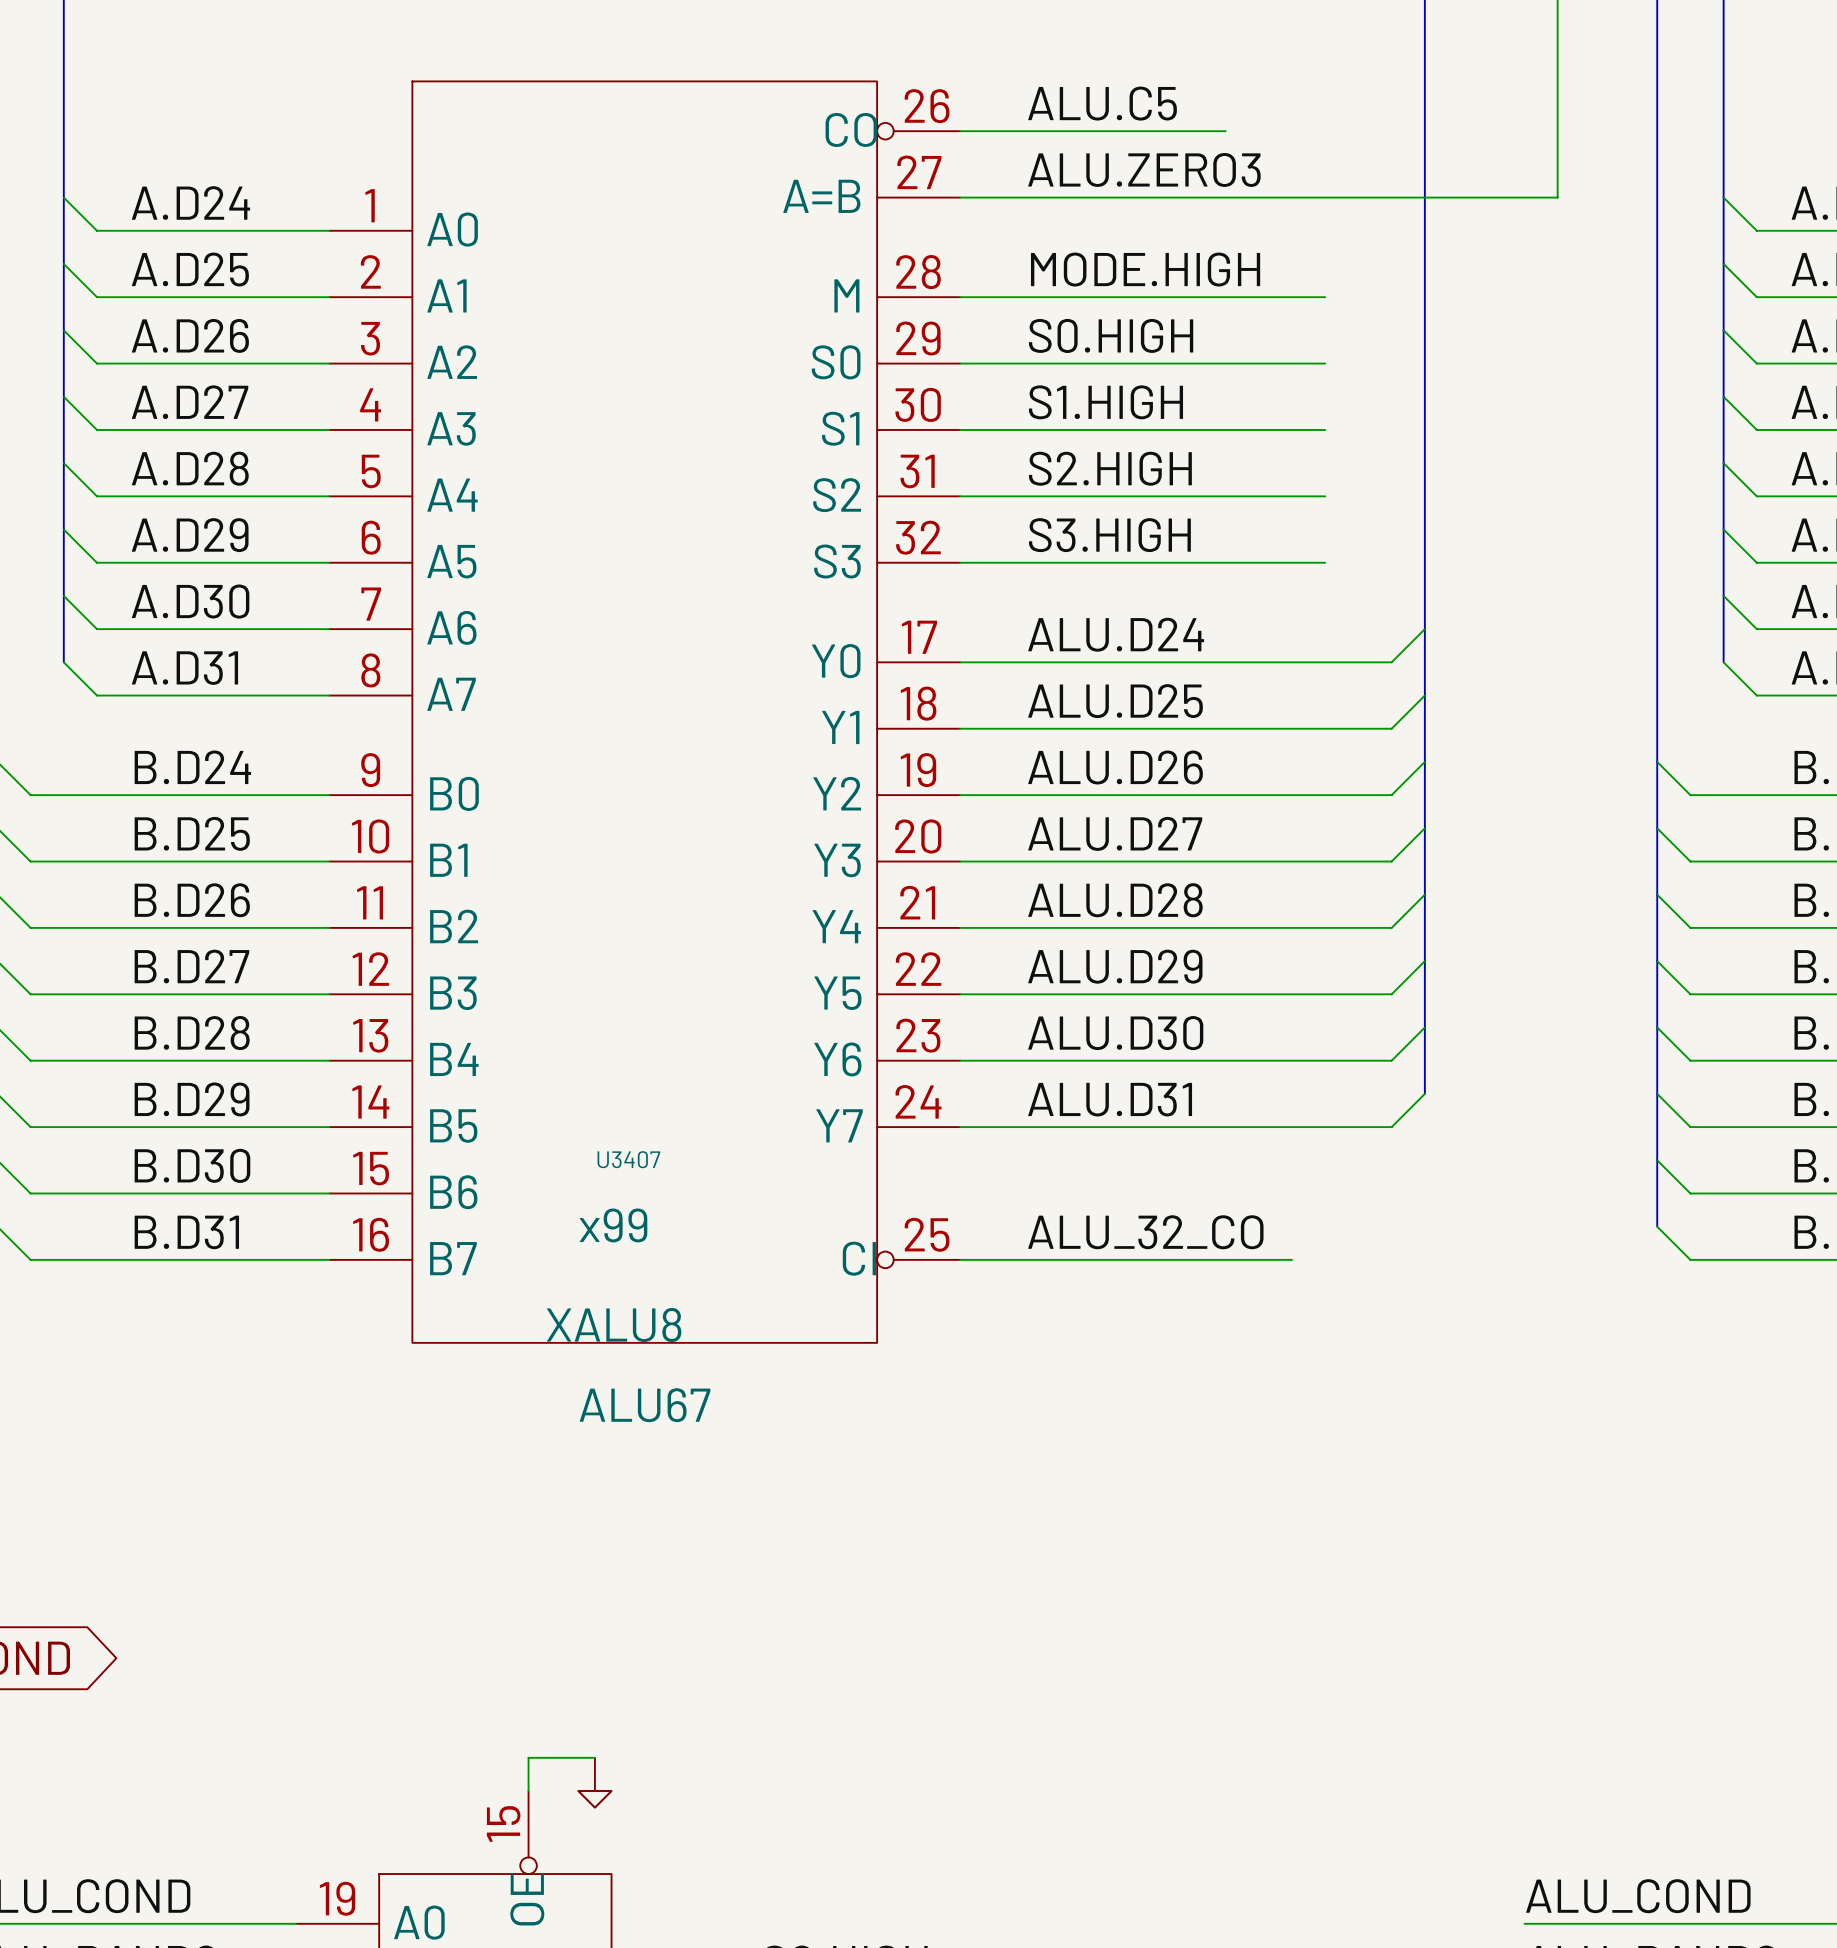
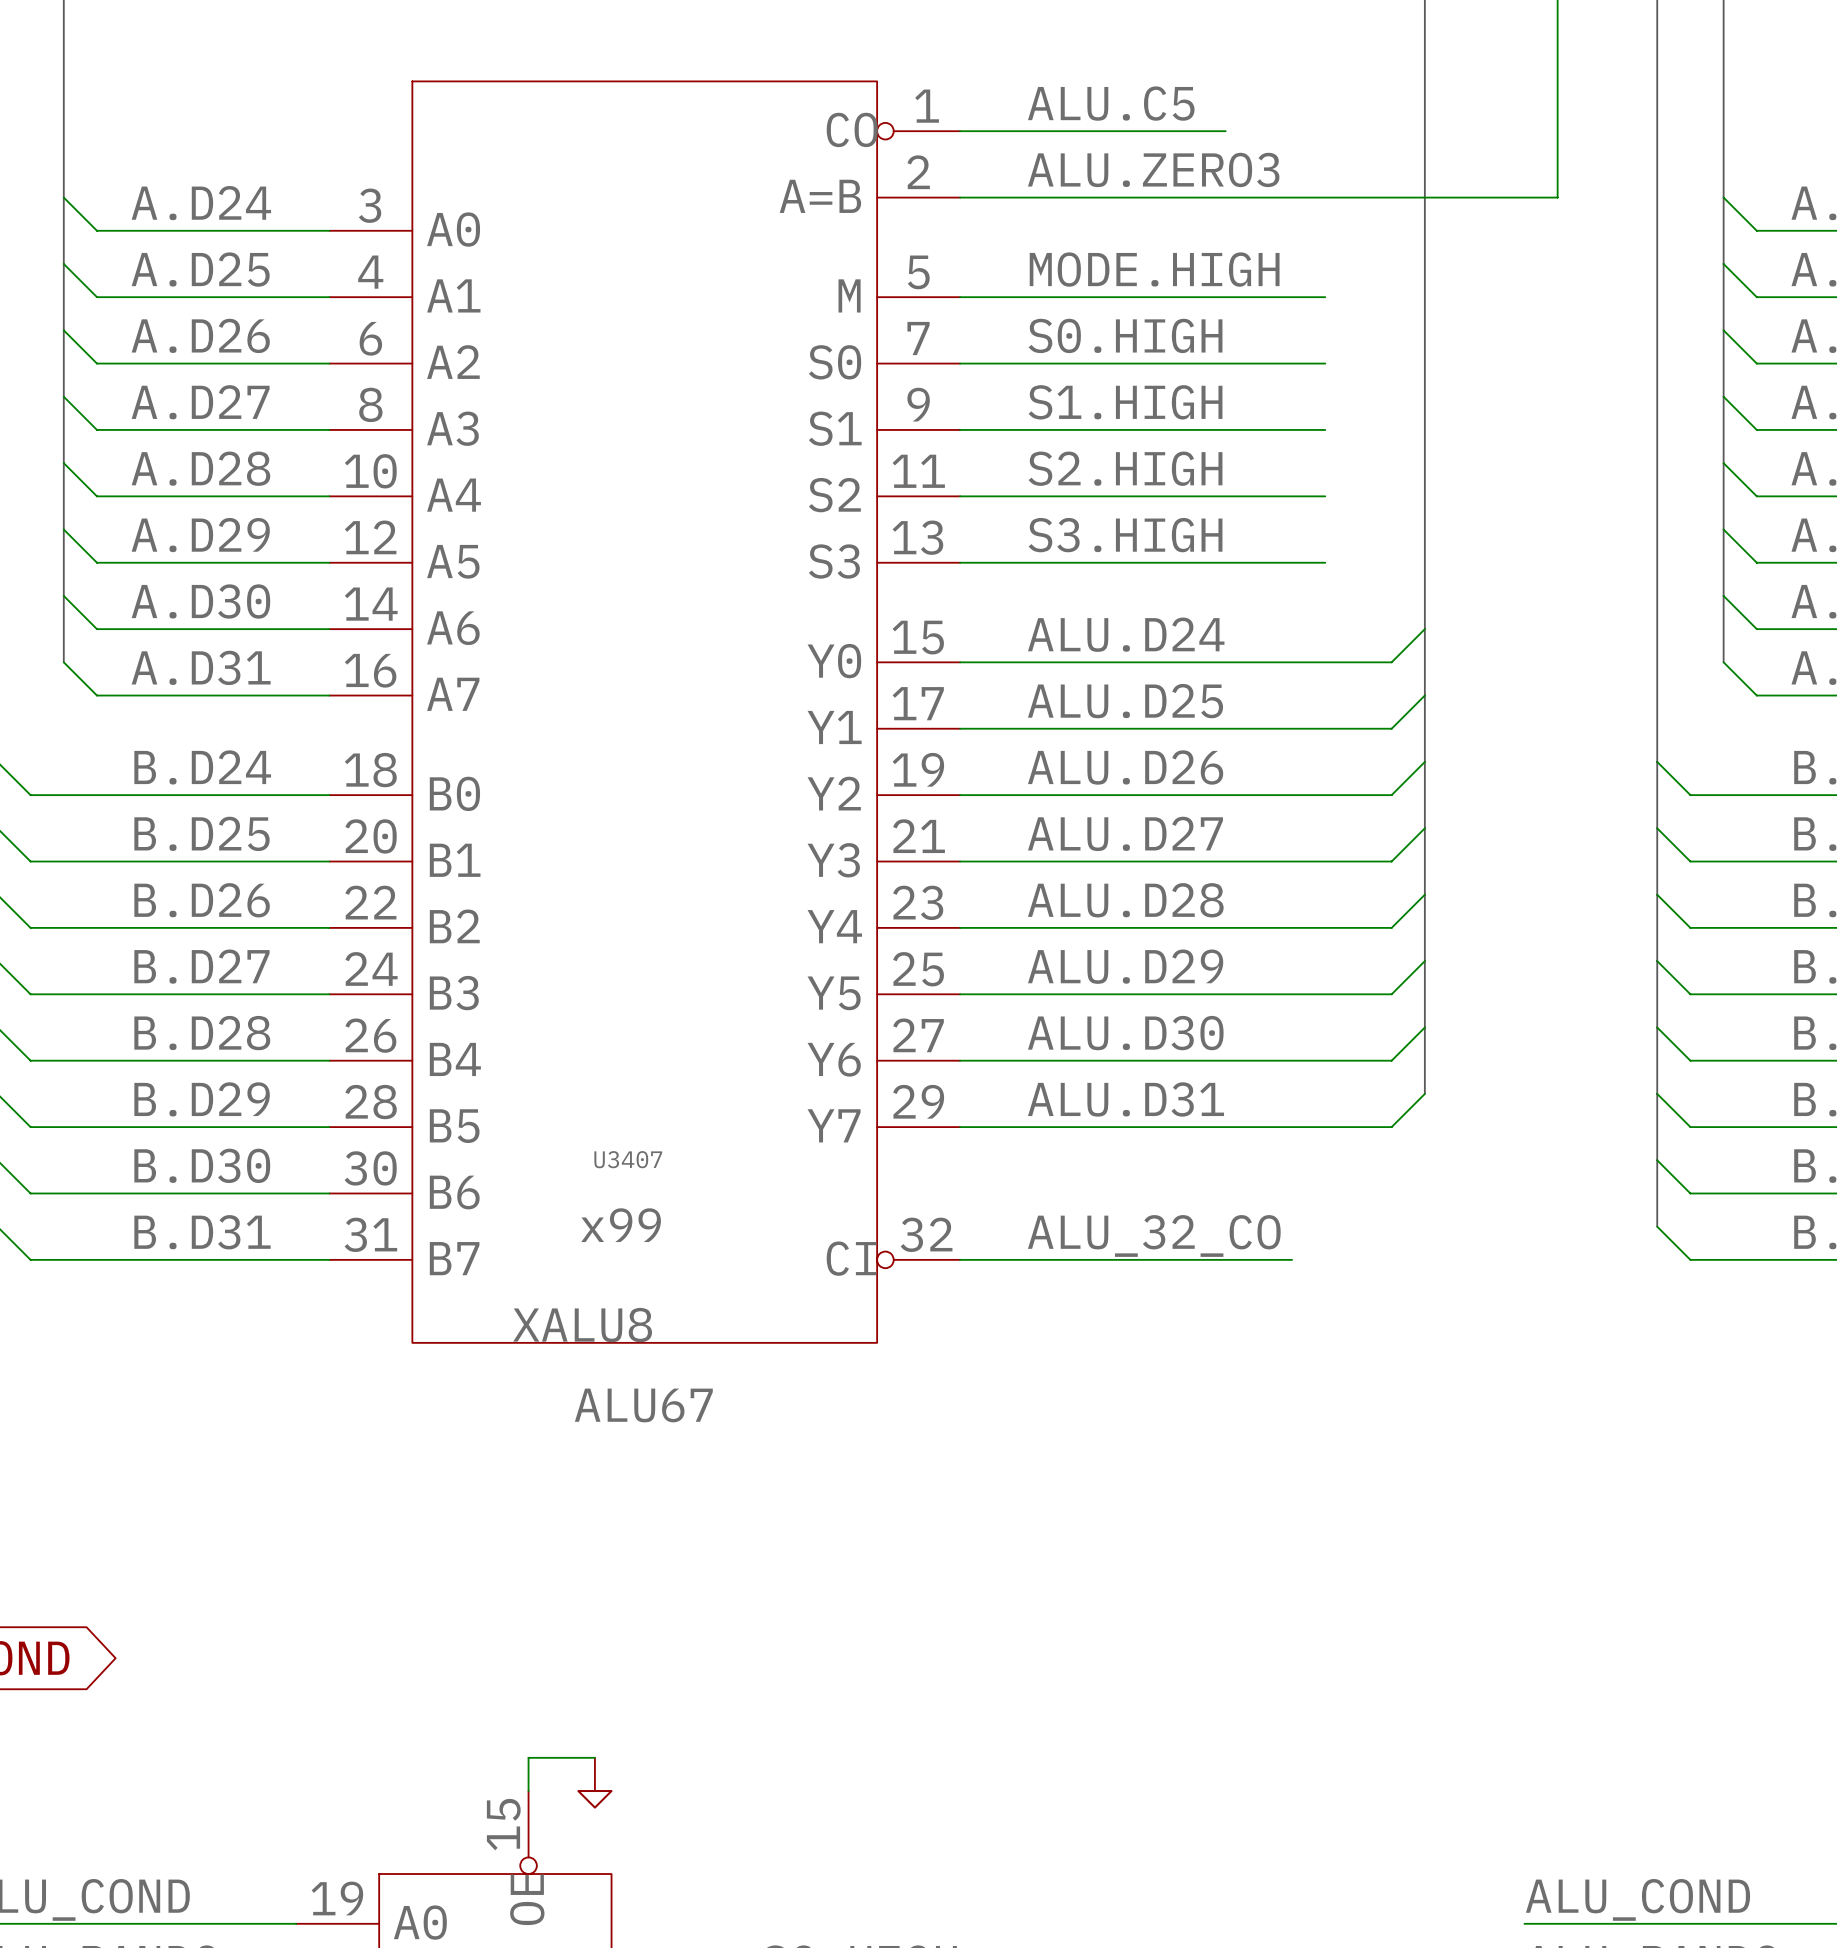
U3407 symbol: [329, 81, 961, 1343] -> [329, 81, 961, 1343]
U3407 value position: XALU8 (614, 1324) -> XALU8 (582, 1325)

